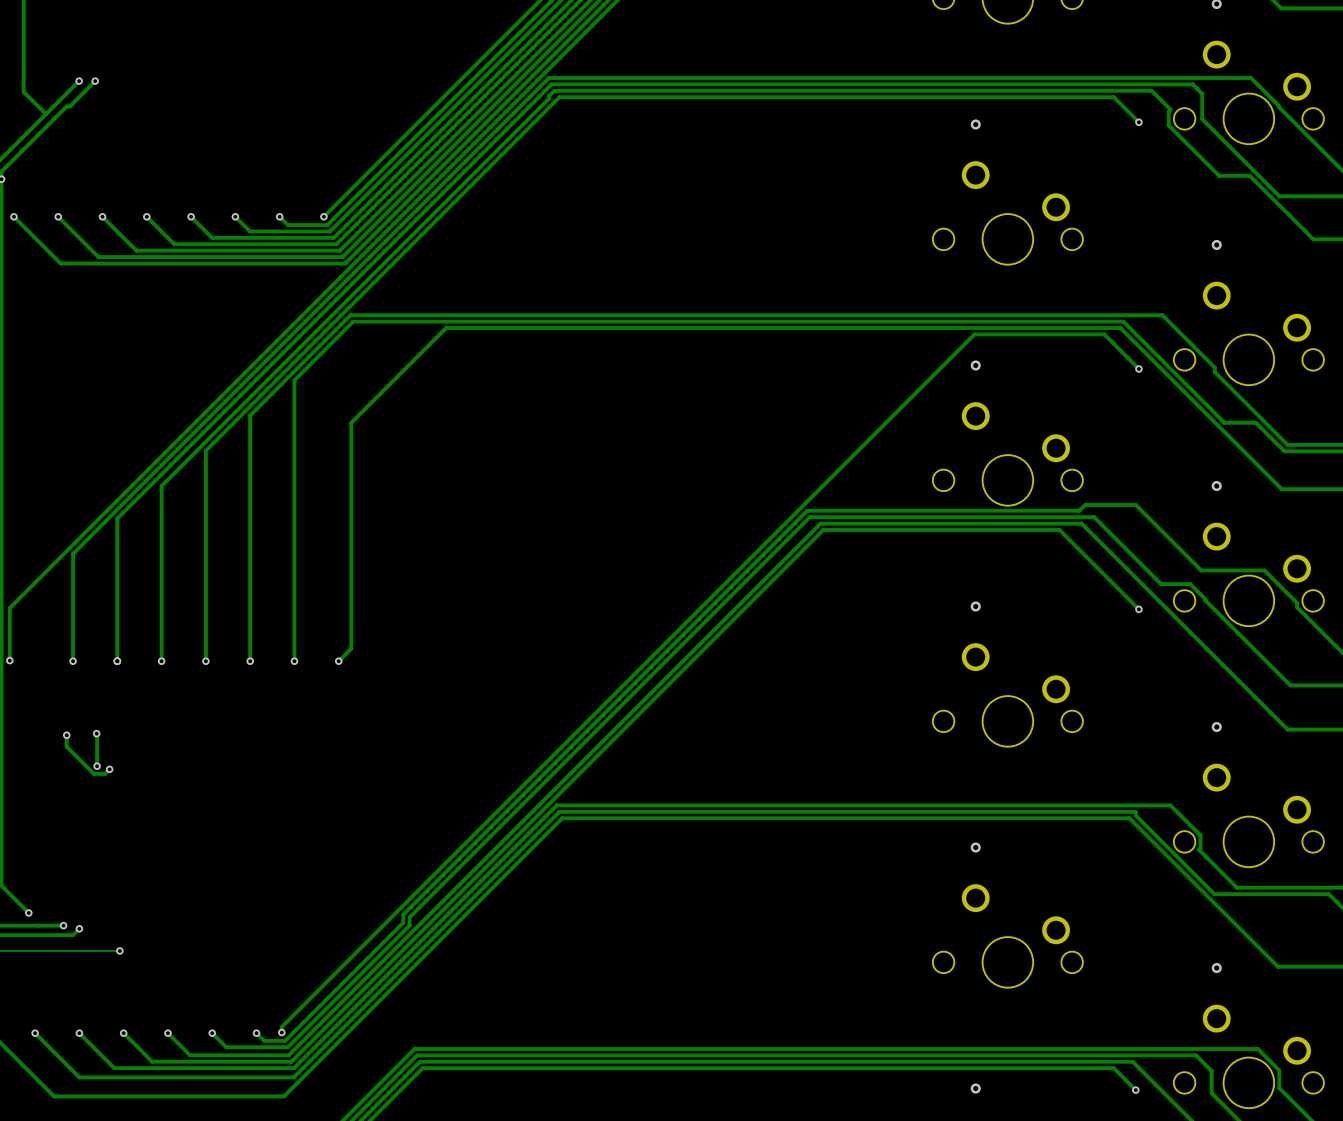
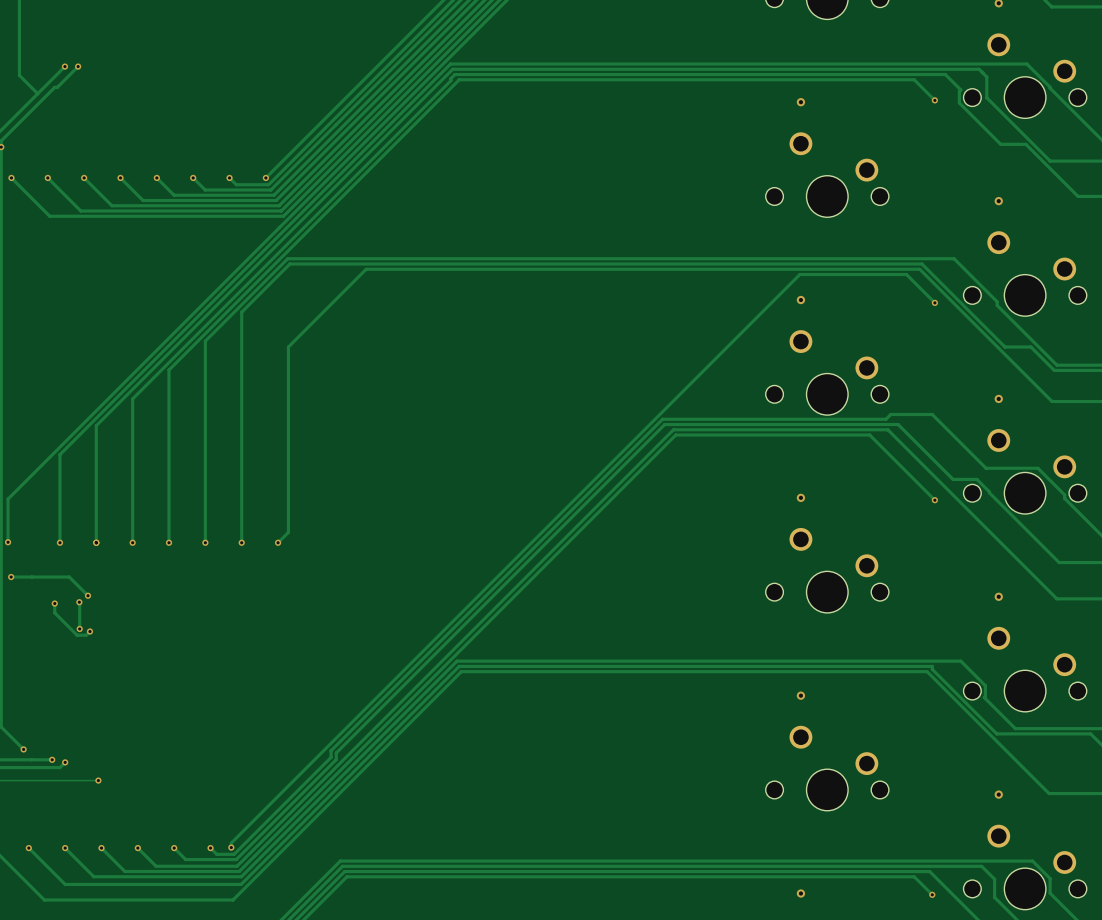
track: none -> (11, 577) (69, 577) (88, 595)
via: none -> (11, 577)
via: none -> (88, 595)

